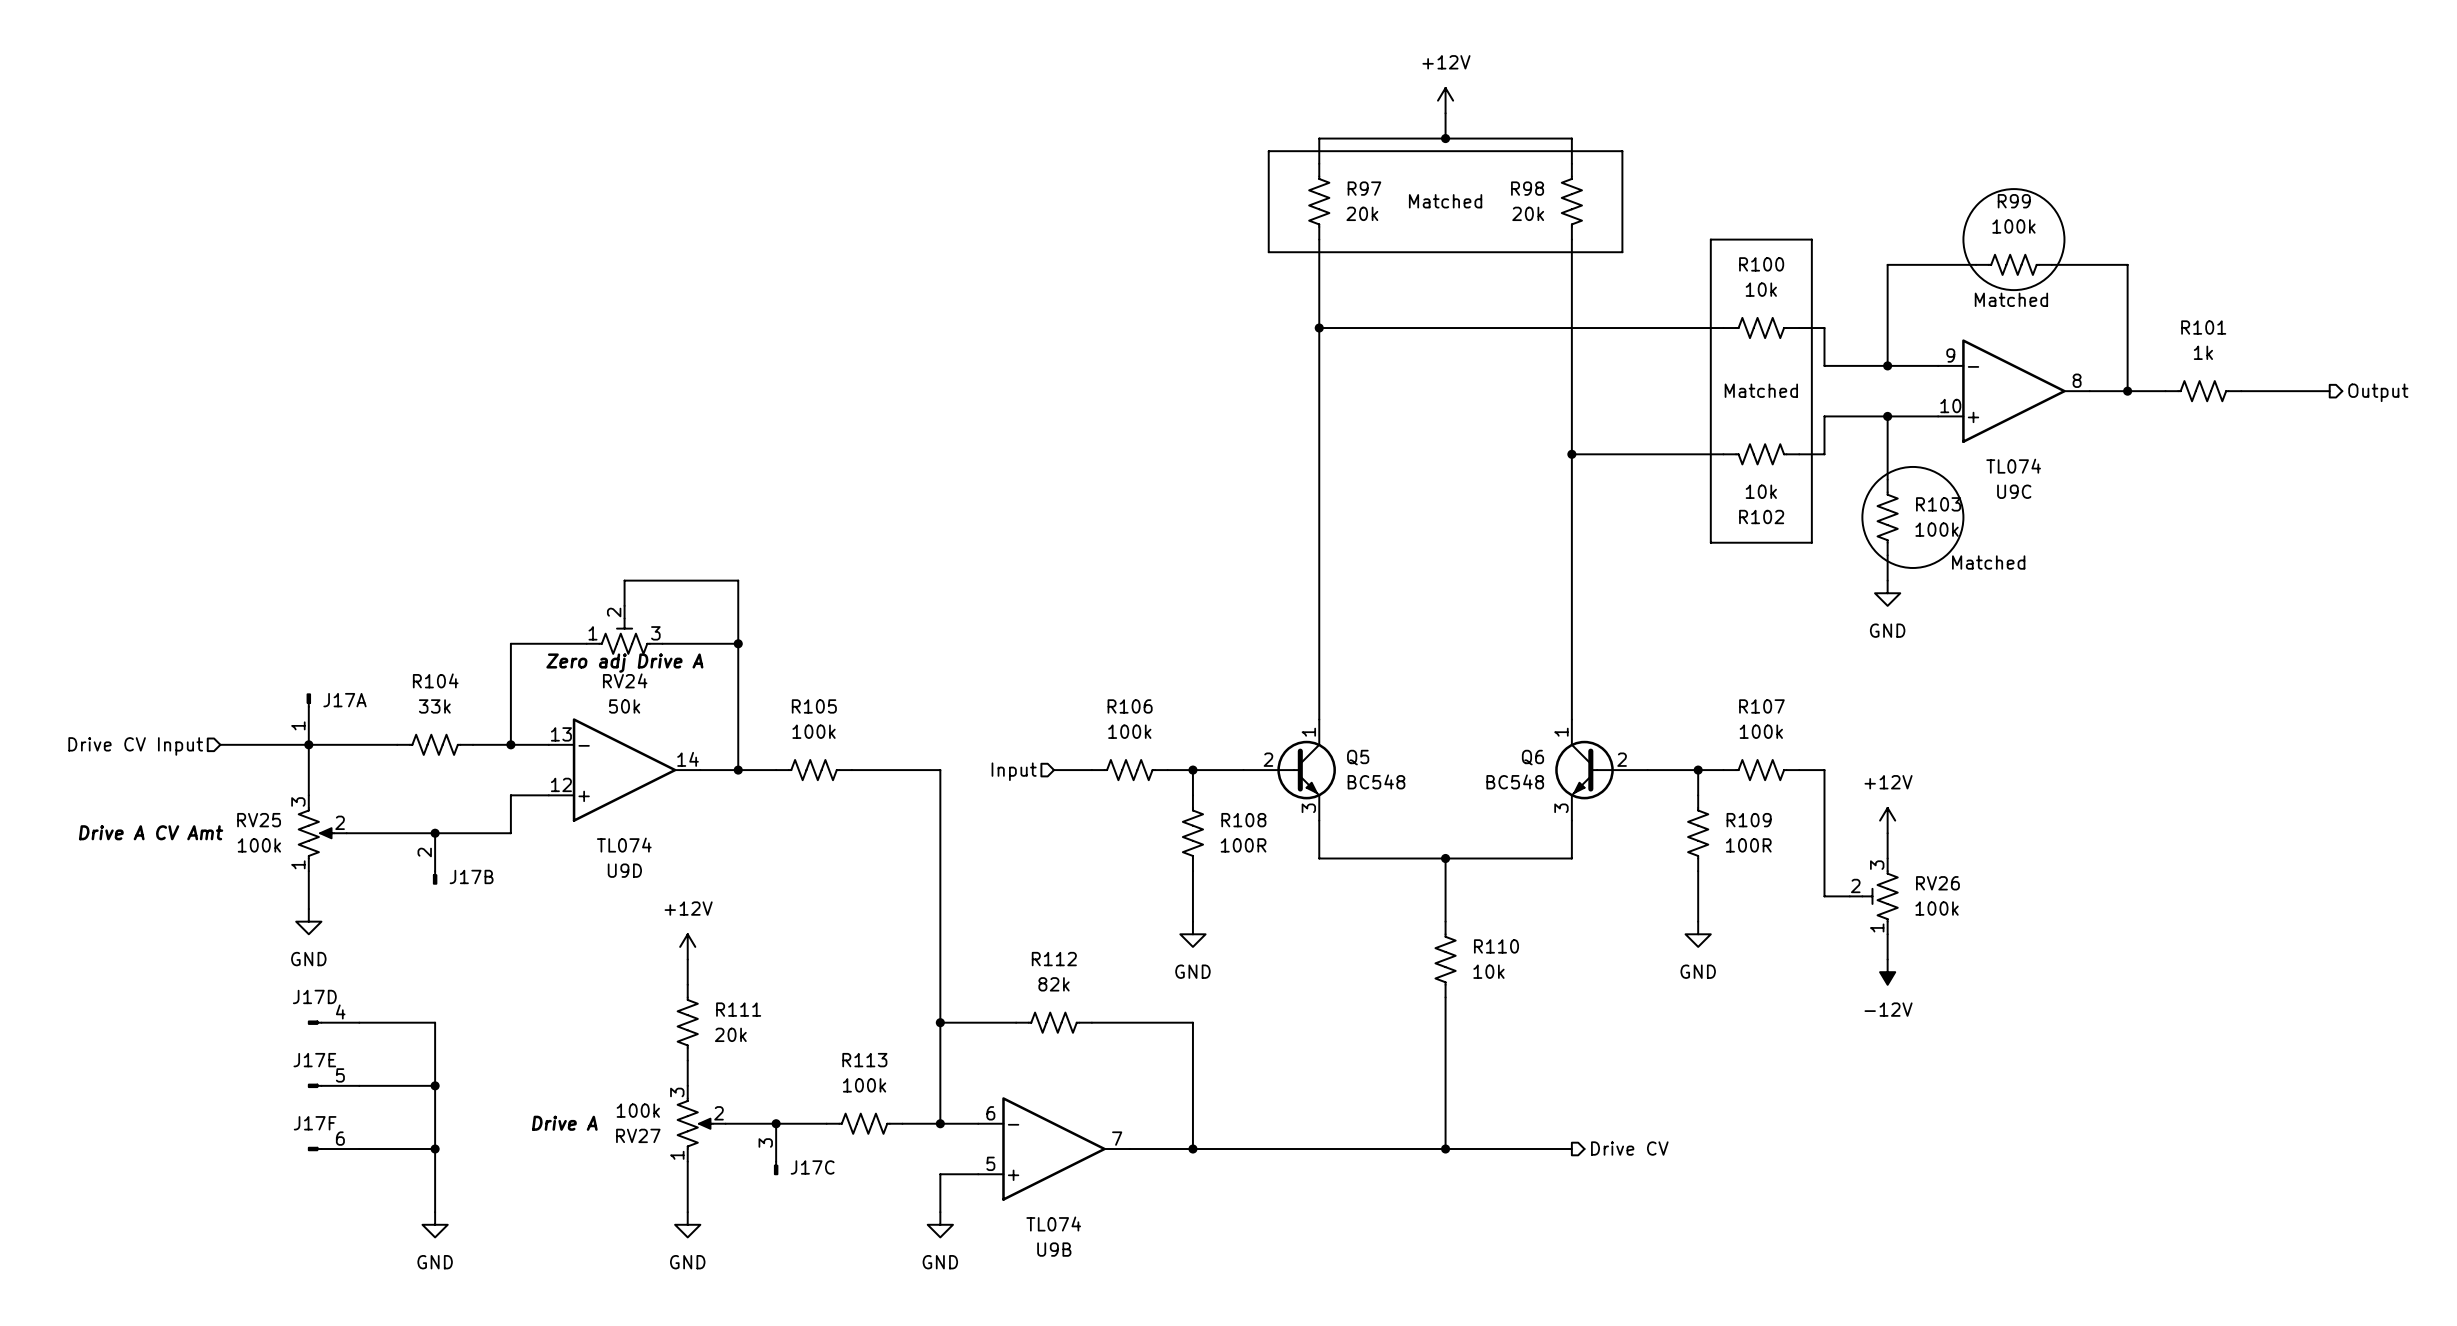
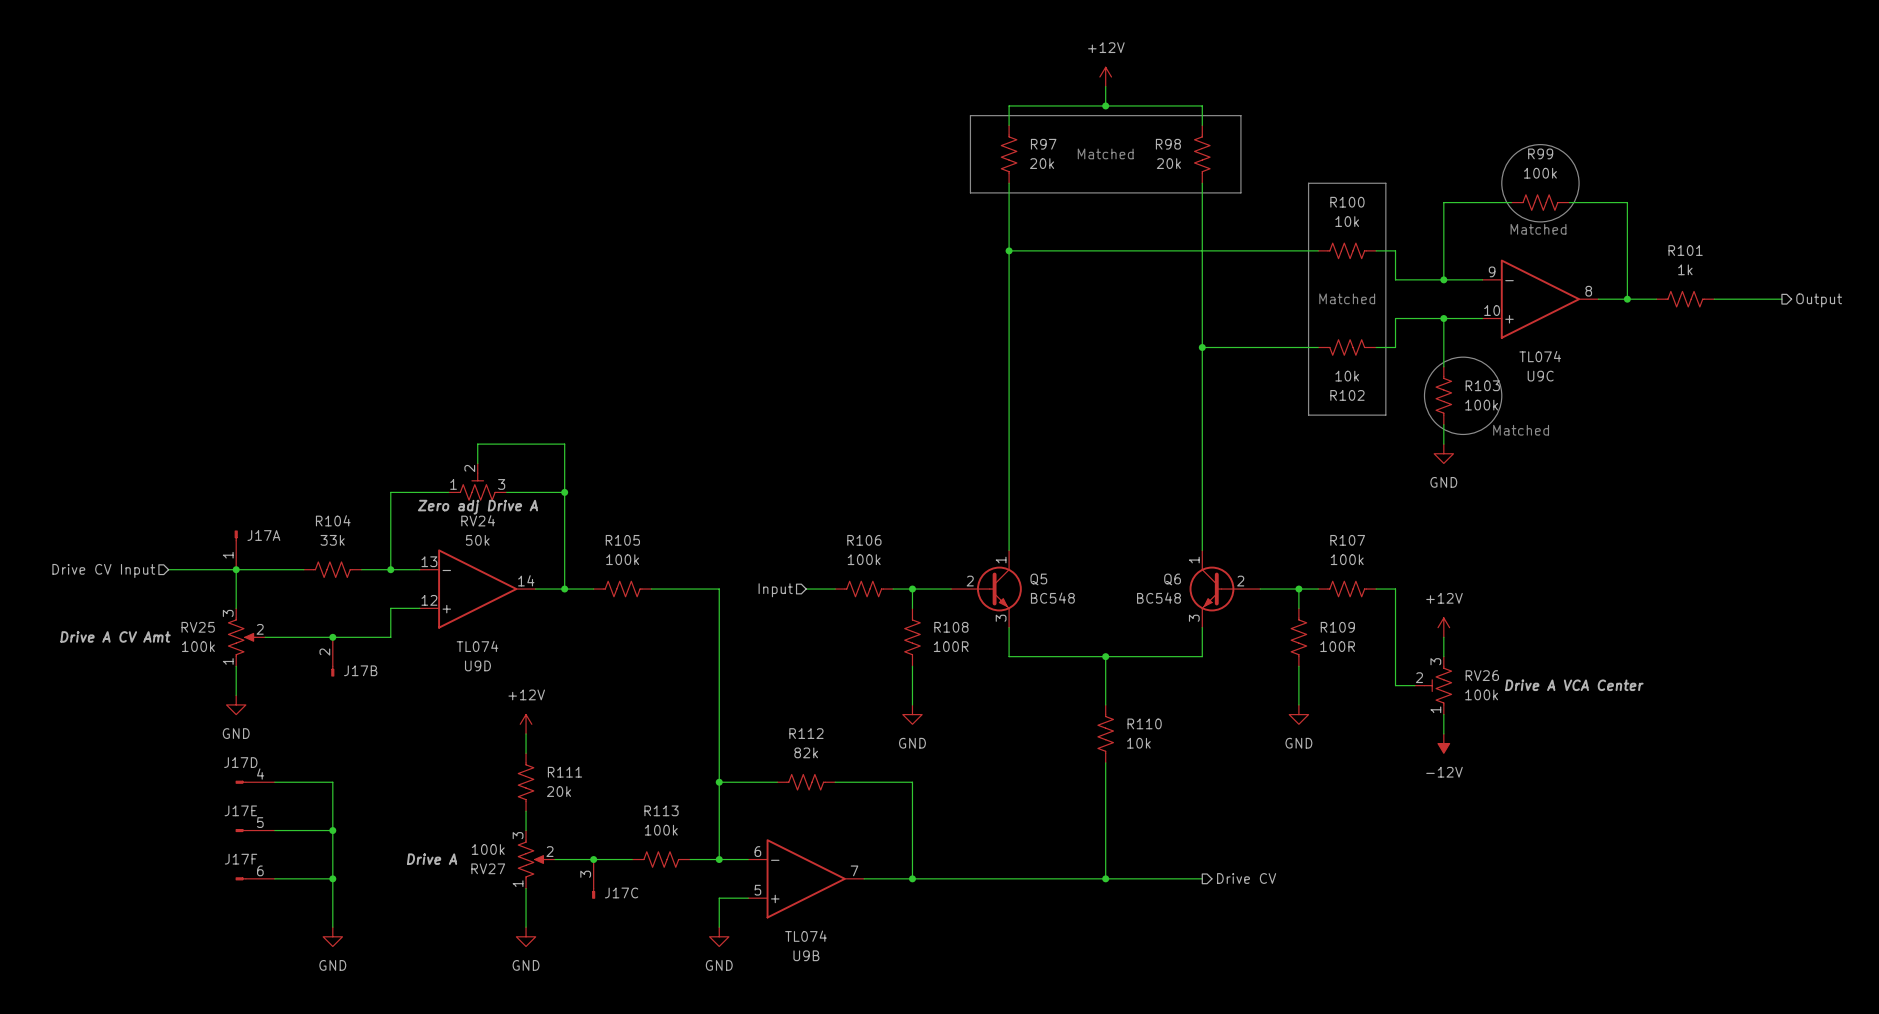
RV26 text: none -> Drive A VCA Center (1574, 685)

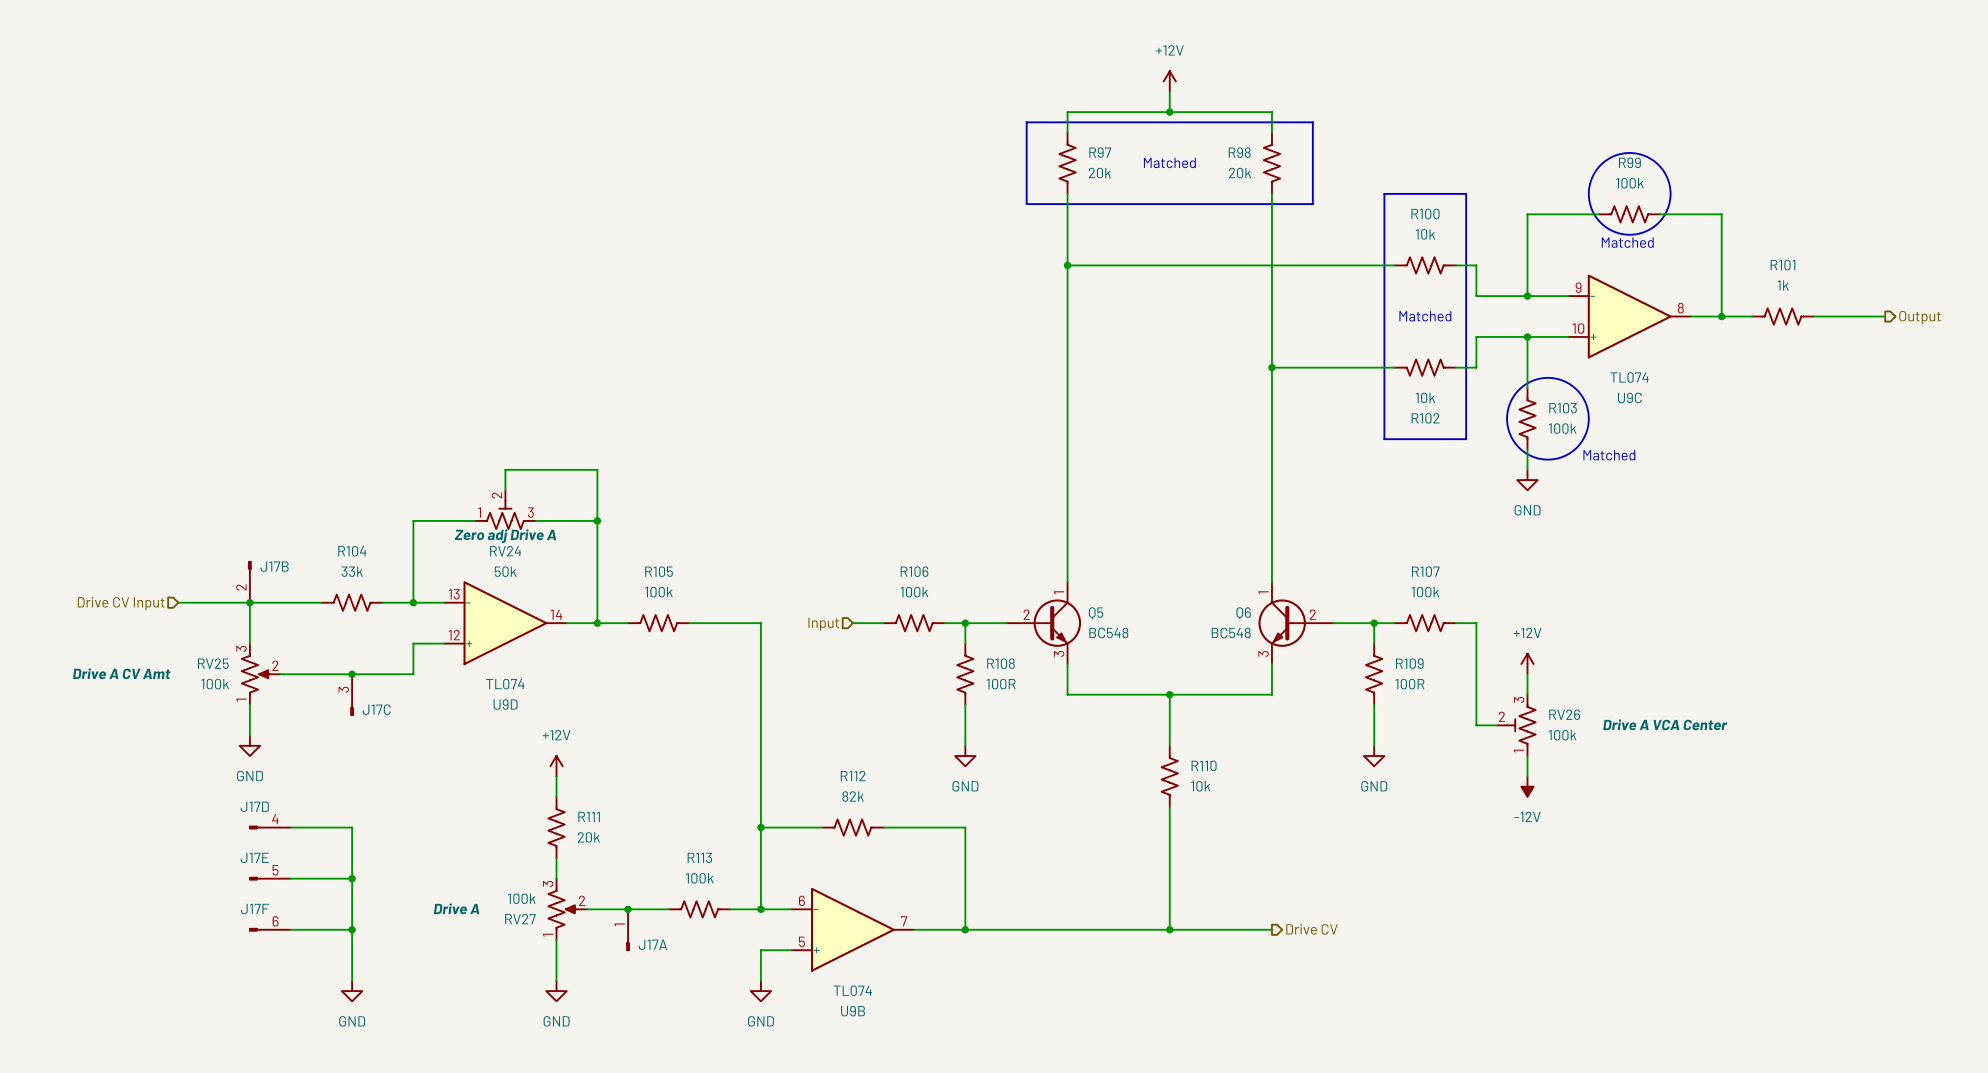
J17A rotation: 0° (236, 535) -> 180° (628, 945)
J17A name position: J17A (263, 535) -> J17A (652, 944)
J17A position: (236, 550) -> (628, 930)
J17B position: (332, 656) -> (249, 581)
J17B name position: J17B (360, 670) -> J17B (274, 566)
J17B rotation: 0° (332, 671) -> 180° (249, 566)
J17C position: (593, 879) -> (352, 695)

